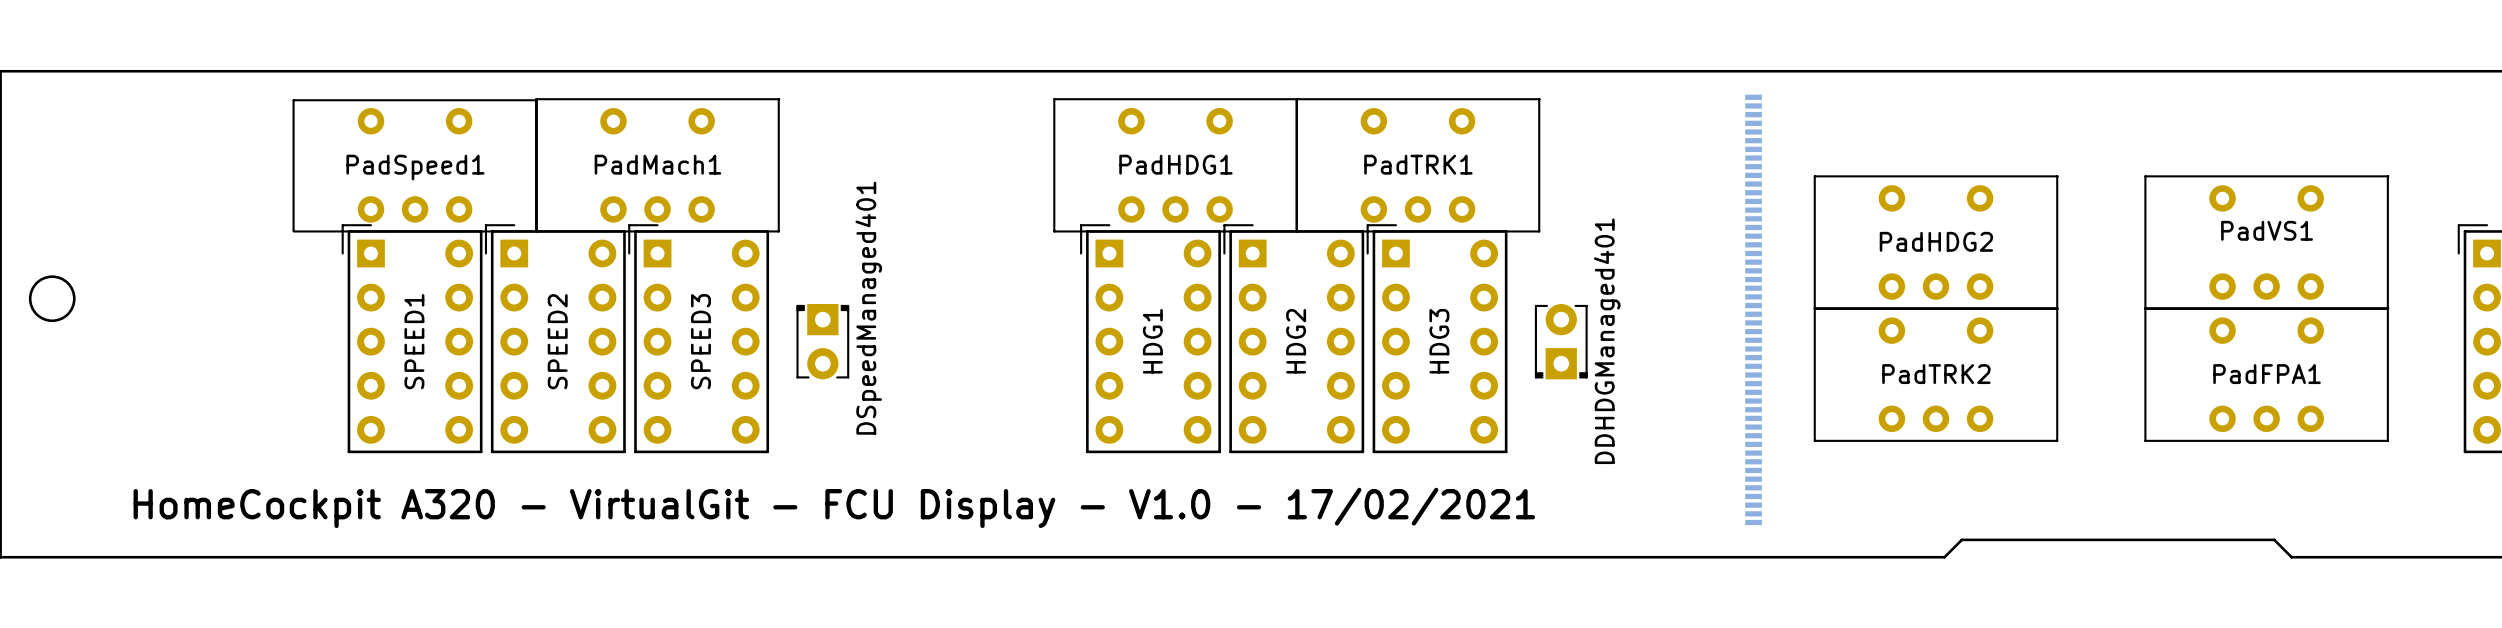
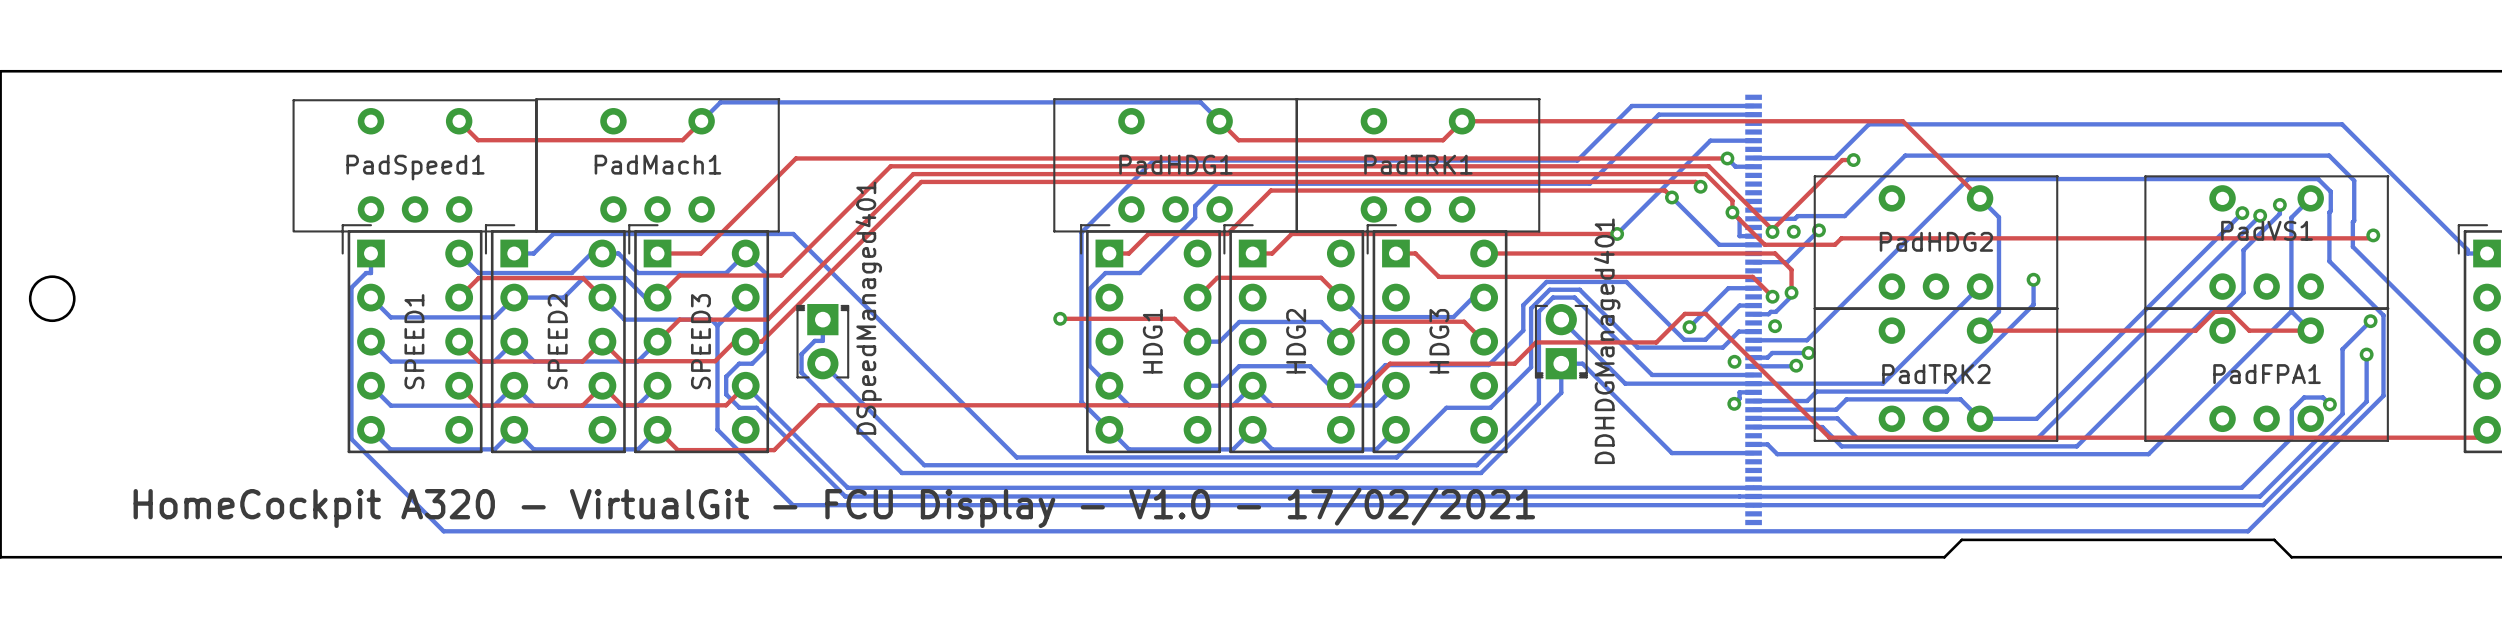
bottom track: none -> (1753, 105) (1631, 105) (1577, 160) (1153, 160) (1081, 232) (1081, 401) (1128, 449) (1233, 449) (1252, 429) (1272, 449) (1376, 449) (1395, 429)
bottom track: none -> (1753, 114) (1658, 114) (1589, 183) (1217, 183) (1195, 205) (1195, 217) (1139, 273) (1105, 273) (1089, 289) (1089, 365) (1128, 405) (1233, 405) (1252, 385) (1272, 405) (1376, 405) (1395, 385)
top track: none -> (459, 121) (478, 140) (682, 140) (701, 121)
bottom track: none -> (701, 121) (720, 102) (1200, 102) (1219, 121)
top track: none -> (1219, 121) (1238, 140) (1443, 140) (1462, 121) (1902, 121) (1980, 198)
bottom track: none -> (1753, 140) (1710, 140) (1617, 233)
bottom track: none -> (1727, 158) (1735, 166) (1753, 166)
top track: none -> (1727, 158) (795, 158) (700, 253) (657, 253)
via: none -> (1727, 158)
bottom track: none -> (1753, 158) (1835, 158) (1868, 124) (2342, 124) (2467, 249) (2467, 253) (2487, 253)
top track: none -> (1853, 160) (1842, 160) (1772, 229)
via: none -> (1853, 160)
top track: none -> (1700, 186) (1695, 181) (921, 181) (761, 341) (734, 341) (715, 361) (621, 361) (602, 341) (582, 361) (478, 361) (459, 341)
via: none -> (1700, 186)
bottom track: none -> (1671, 197) (1719, 244) (1753, 244)
top track: none -> (1671, 197) (1665, 190) (1270, 190) (1227, 233) (1148, 233) (1128, 253) (1109, 253)
via: none -> (1671, 197)
bottom track: none -> (1980, 198) (1998, 217) (1998, 311) (1980, 330)
bottom track: none -> (2310, 198) (2291, 217) (2291, 311)
bottom track: none -> (2279, 204) (2279, 213) (2243, 250) (2243, 292) (2224, 311) (2211, 311) (2076, 446) (1841, 446) (1822, 427) (1753, 427)
via: none -> (2279, 204)
bottom track: none -> (1732, 212) (1739, 219) (1739, 236) (1753, 236)
via: none -> (1732, 212)
bottom track: none -> (2242, 213) (2036, 418) (1980, 418) (1960, 399) (1846, 399) (1836, 409) (1753, 409)
via: none -> (2242, 213)
bottom track: none -> (2260, 215) (2037, 438) (1857, 438) (1837, 418) (1753, 418)
via: none -> (2260, 215)
bottom track: none -> (1753, 218) (1844, 216) (1905, 155) (2329, 155) (2354, 180) (2352, 246) (2487, 380) (2487, 385)
top track: none -> (1772, 229) (1709, 166) (890, 166) (781, 275) (679, 275) (657, 297)
bottom track: none -> (1818, 230) (1787, 262) (1753, 262)
via: none -> (1818, 230)
via: none -> (1772, 231)
via: none -> (1793, 231)
top track: none -> (1617, 233) (1291, 233) (1272, 253) (1252, 253)
via: none -> (1617, 233)
top track: none -> (2373, 235) (2370, 238) (1841, 238) (1835, 244) (1764, 244) (1732, 212) (1732, 200) (1705, 174) (913, 174) (767, 319) (679, 319) (657, 341)
via: none -> (2373, 235)
bottom track: none -> (370, 253) (370, 273) (366, 273) (351, 287) (351, 439) (443, 531) (2248, 531) (2383, 395) (2383, 315) (2329, 261) (2330, 191) (2318, 179) (1968, 179) (1806, 340) (1753, 340)
bottom track: none -> (459, 253) (478, 273) (571, 273) (591, 253) (618, 253) (638, 273) (726, 273) (745, 253) (765, 273) (765, 350) (752, 363) (739, 363) (726, 376) (726, 394) (739, 407) (756, 407) (845, 496) (2260, 496) (2342, 413) (2342, 349) (2370, 321)
bottom track: none -> (514, 253) (533, 253) (553, 233) (793, 233) (1016, 457) (1396, 457) (1446, 407) (1490, 407) (1531, 367) (1531, 308) (1549, 289) (1579, 289) (1637, 347) (1722, 347) (1738, 331) (1753, 331)
top track: none -> (1395, 253) (1415, 253) (1438, 276) (1752, 276) (1772, 296)
top track: none -> (1484, 253) (1775, 253) (1791, 269) (1791, 292)
bottom track: none -> (2033, 279) (2033, 304) (1946, 391) (1816, 391) (1807, 401) (1753, 401)
via: none -> (2033, 279)
bottom track: none -> (1980, 286) (1882, 383) (1625, 383) (1561, 319)
bottom track: none -> (1753, 288) (1728, 288) (1689, 327)
bottom track: none -> (1791, 292) (1791, 296) (1775, 311) (1770, 311) (1768, 314) (1753, 314)
via: none -> (1791, 292)
via: none -> (1772, 296)
bottom track: none -> (370, 297) (390, 317) (494, 317) (514, 297) (563, 297) (583, 277) (625, 277) (645, 297) (657, 297)
top track: none -> (459, 297) (478, 278) (582, 278) (602, 297)
bottom track: none -> (602, 297) (624, 319) (711, 319) (717, 325)
bottom track: none -> (745, 297) (717, 325)
top track: none -> (1197, 297) (1217, 277) (1321, 277) (1340, 297)
bottom track: none -> (1340, 297) (1360, 317) (1453, 317) (1473, 297) (1484, 297)
bottom track: none -> (1753, 305) (1739, 305) (1705, 339) (1684, 339) (1626, 281) (1546, 281) (1523, 305) (1523, 330) (1488, 365) (1385, 365) (1364, 385) (1329, 385) (1310, 366) (1239, 366) (1219, 385) (1197, 385)
bottom track: none -> (2291, 311) (2148, 454) (1777, 454) (1767, 444) (1753, 444)
bottom track: none -> (2291, 311) (2310, 330)
top track: none -> (1060, 318) (1174, 318) (1197, 341)
via: none -> (1060, 318)
bottom track: none -> (822, 319) (822, 340) (814, 340) (801, 354) (801, 372) (901, 473) (1481, 473) (1561, 392) (1561, 363) (1582, 363) (1671, 453) (1753, 453)
via: none -> (2370, 321)
bottom track: none -> (717, 325) (717, 429) (792, 505) (2263, 505) (2366, 401) (2366, 354)
via: none -> (1775, 326)
via: none -> (1689, 327)
top track: none -> (1980, 330) (2195, 330) (2214, 311) (2230, 311) (2249, 330) (2310, 330)
bottom track: none -> (370, 341) (390, 361) (494, 361) (514, 341) (534, 361) (637, 361) (657, 341)
bottom track: none -> (1197, 341) (1219, 341) (1239, 321) (1321, 321) (1340, 341)
top track: none -> (1340, 341) (1360, 321) (1464, 321) (1484, 341)
bottom track: none -> (1808, 352) (1772, 352) (1767, 357) (1753, 357)
via: none -> (1808, 352)
via: none -> (2366, 354)
via: none -> (1734, 361)
bottom track: none -> (822, 363) (924, 465) (1476, 465) (1538, 403) (1538, 311) (1553, 297) (1574, 297) (1652, 374) (1753, 374)
bottom track: none -> (1796, 365) (1753, 366)
via: none -> (1796, 365)
bottom track: none -> (370, 385) (390, 405) (494, 405) (514, 385) (534, 405) (637, 405) (657, 385)
top track: none -> (459, 385) (478, 405) (582, 405) (602, 385) (621, 405) (726, 405) (745, 385)
bottom track: none -> (745, 385) (847, 487) (2241, 487) (2291, 437) (2291, 409) (2304, 397) (2322, 397) (2329, 404) (2325, 404)
bottom track: none -> (1753, 392) (1739, 392) (1739, 398) (1734, 403)
via: none -> (1734, 403)
via: none -> (2329, 404)
bottom track: none -> (370, 429) (390, 449) (494, 449) (514, 429) (533, 449) (638, 449) (657, 429)
top track: none -> (657, 429) (677, 450) (774, 450) (818, 405) (1349, 405) (1390, 363) (1514, 363) (1536, 342) (1656, 342) (1684, 313) (1705, 313) (1829, 437) (2479, 437) (2487, 429)

